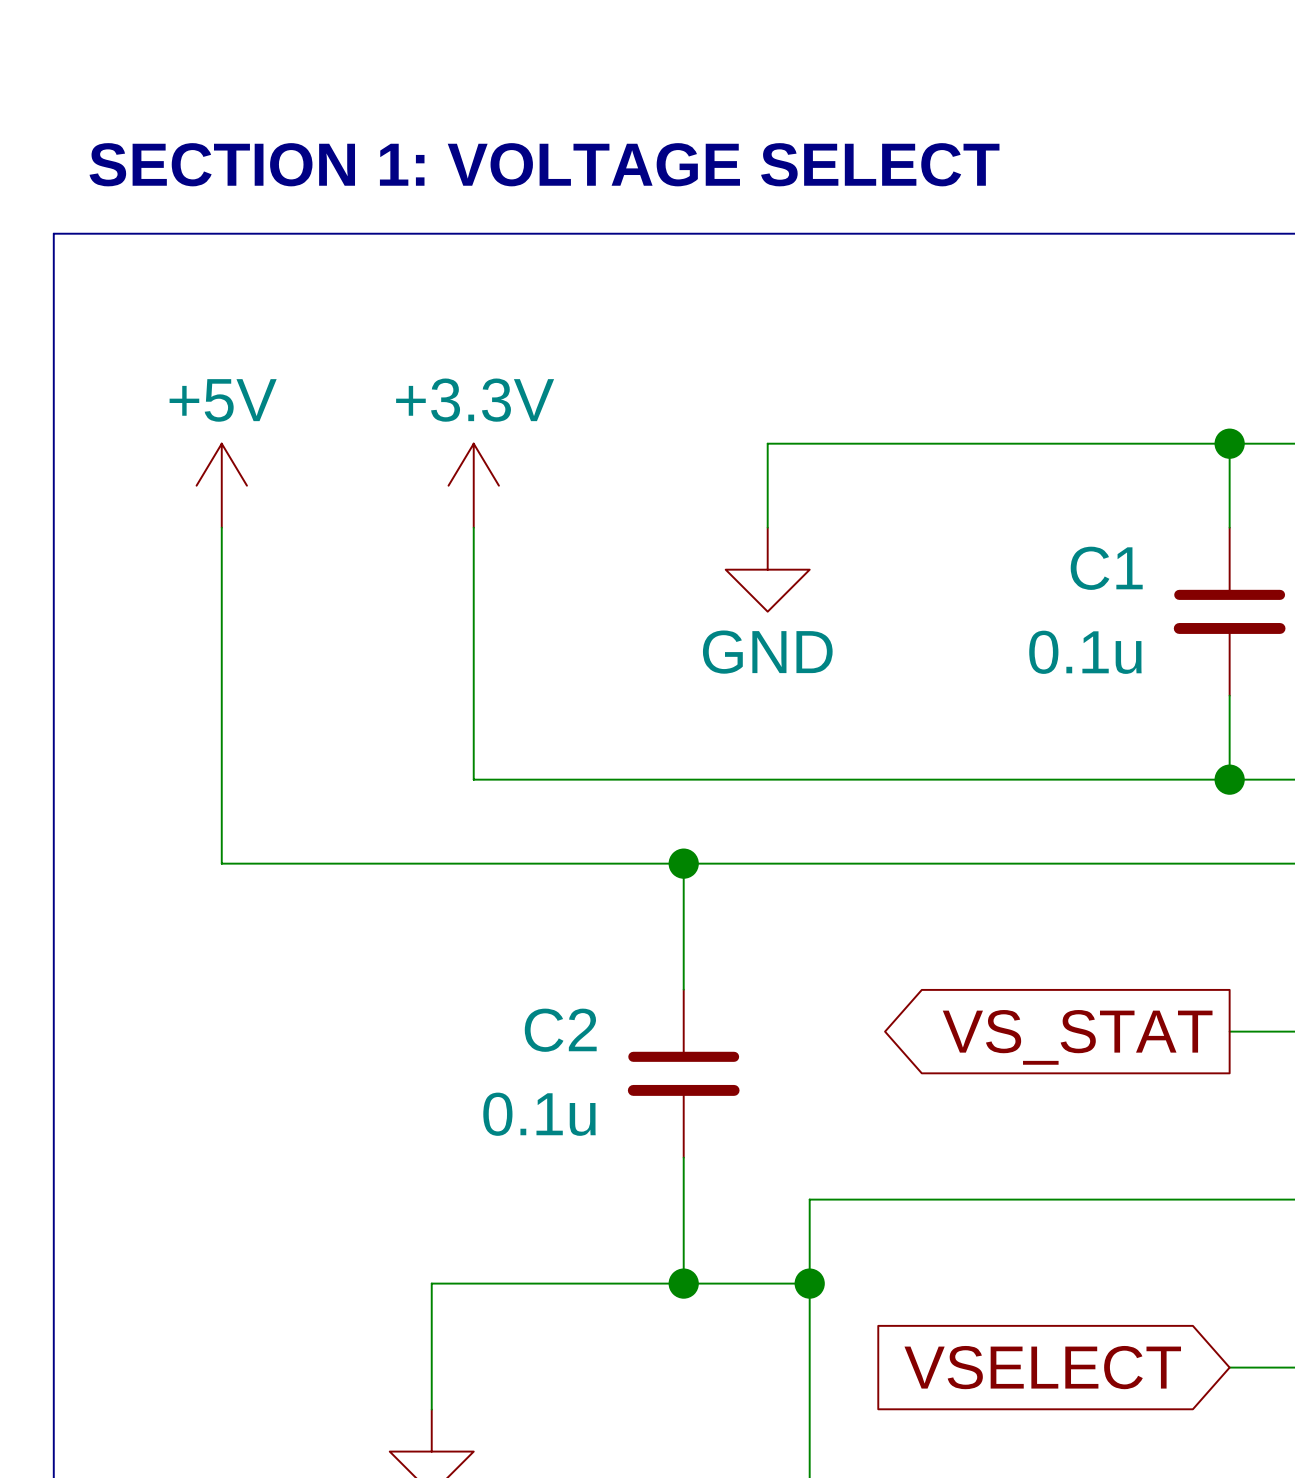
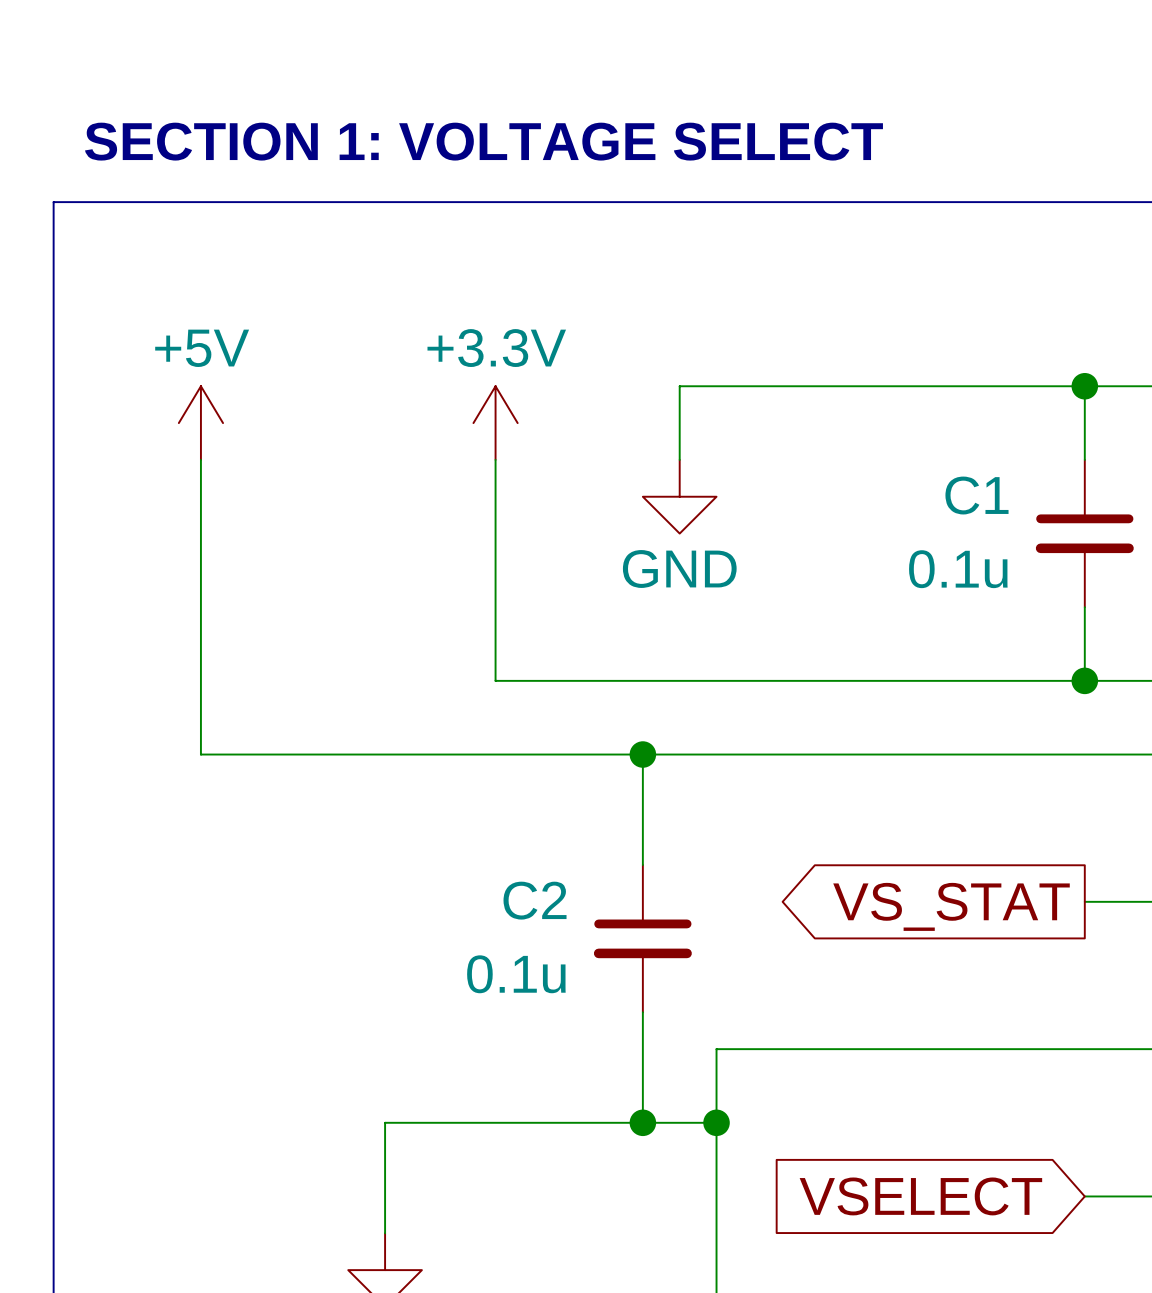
power symbol position: +3.3V (473, 485) -> +3.3V (495, 423)
wire: (473, 527) (473, 779) (557, 779) -> (495, 459) (495, 680)
wire: (683, 863) (683, 989) -> (642, 754) (642, 865)
junction position: (683, 863) -> (642, 754)
C2 position: (683, 1073) -> (642, 938)
wire: (683, 1157) (683, 1283) -> (642, 1012) (642, 1122)
junction position: (683, 1283) -> (642, 1122)

